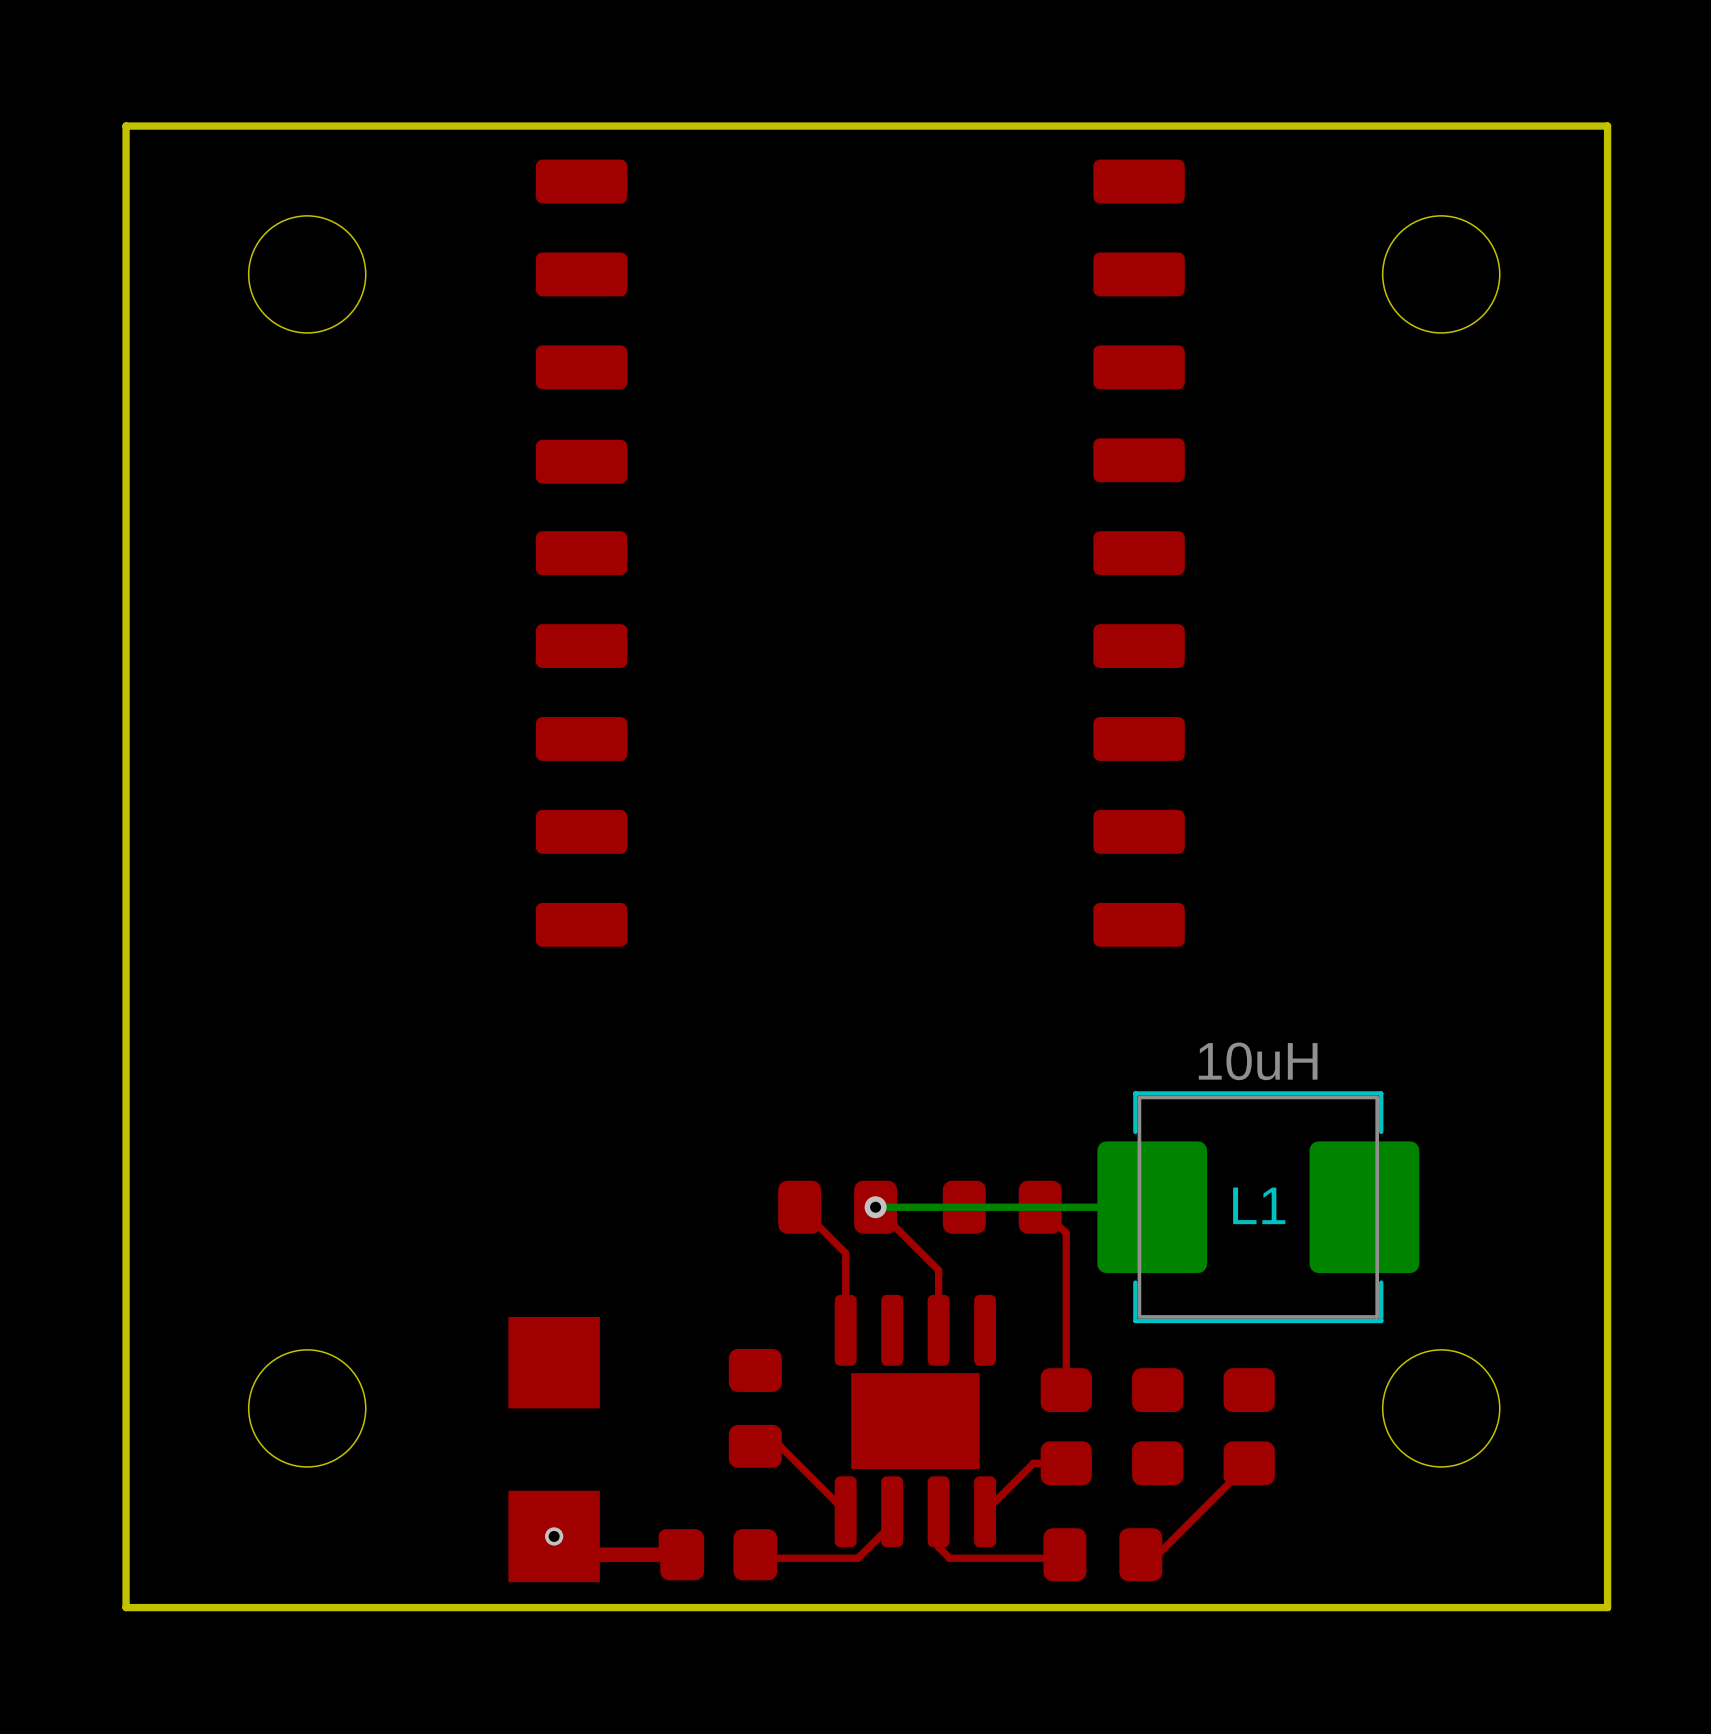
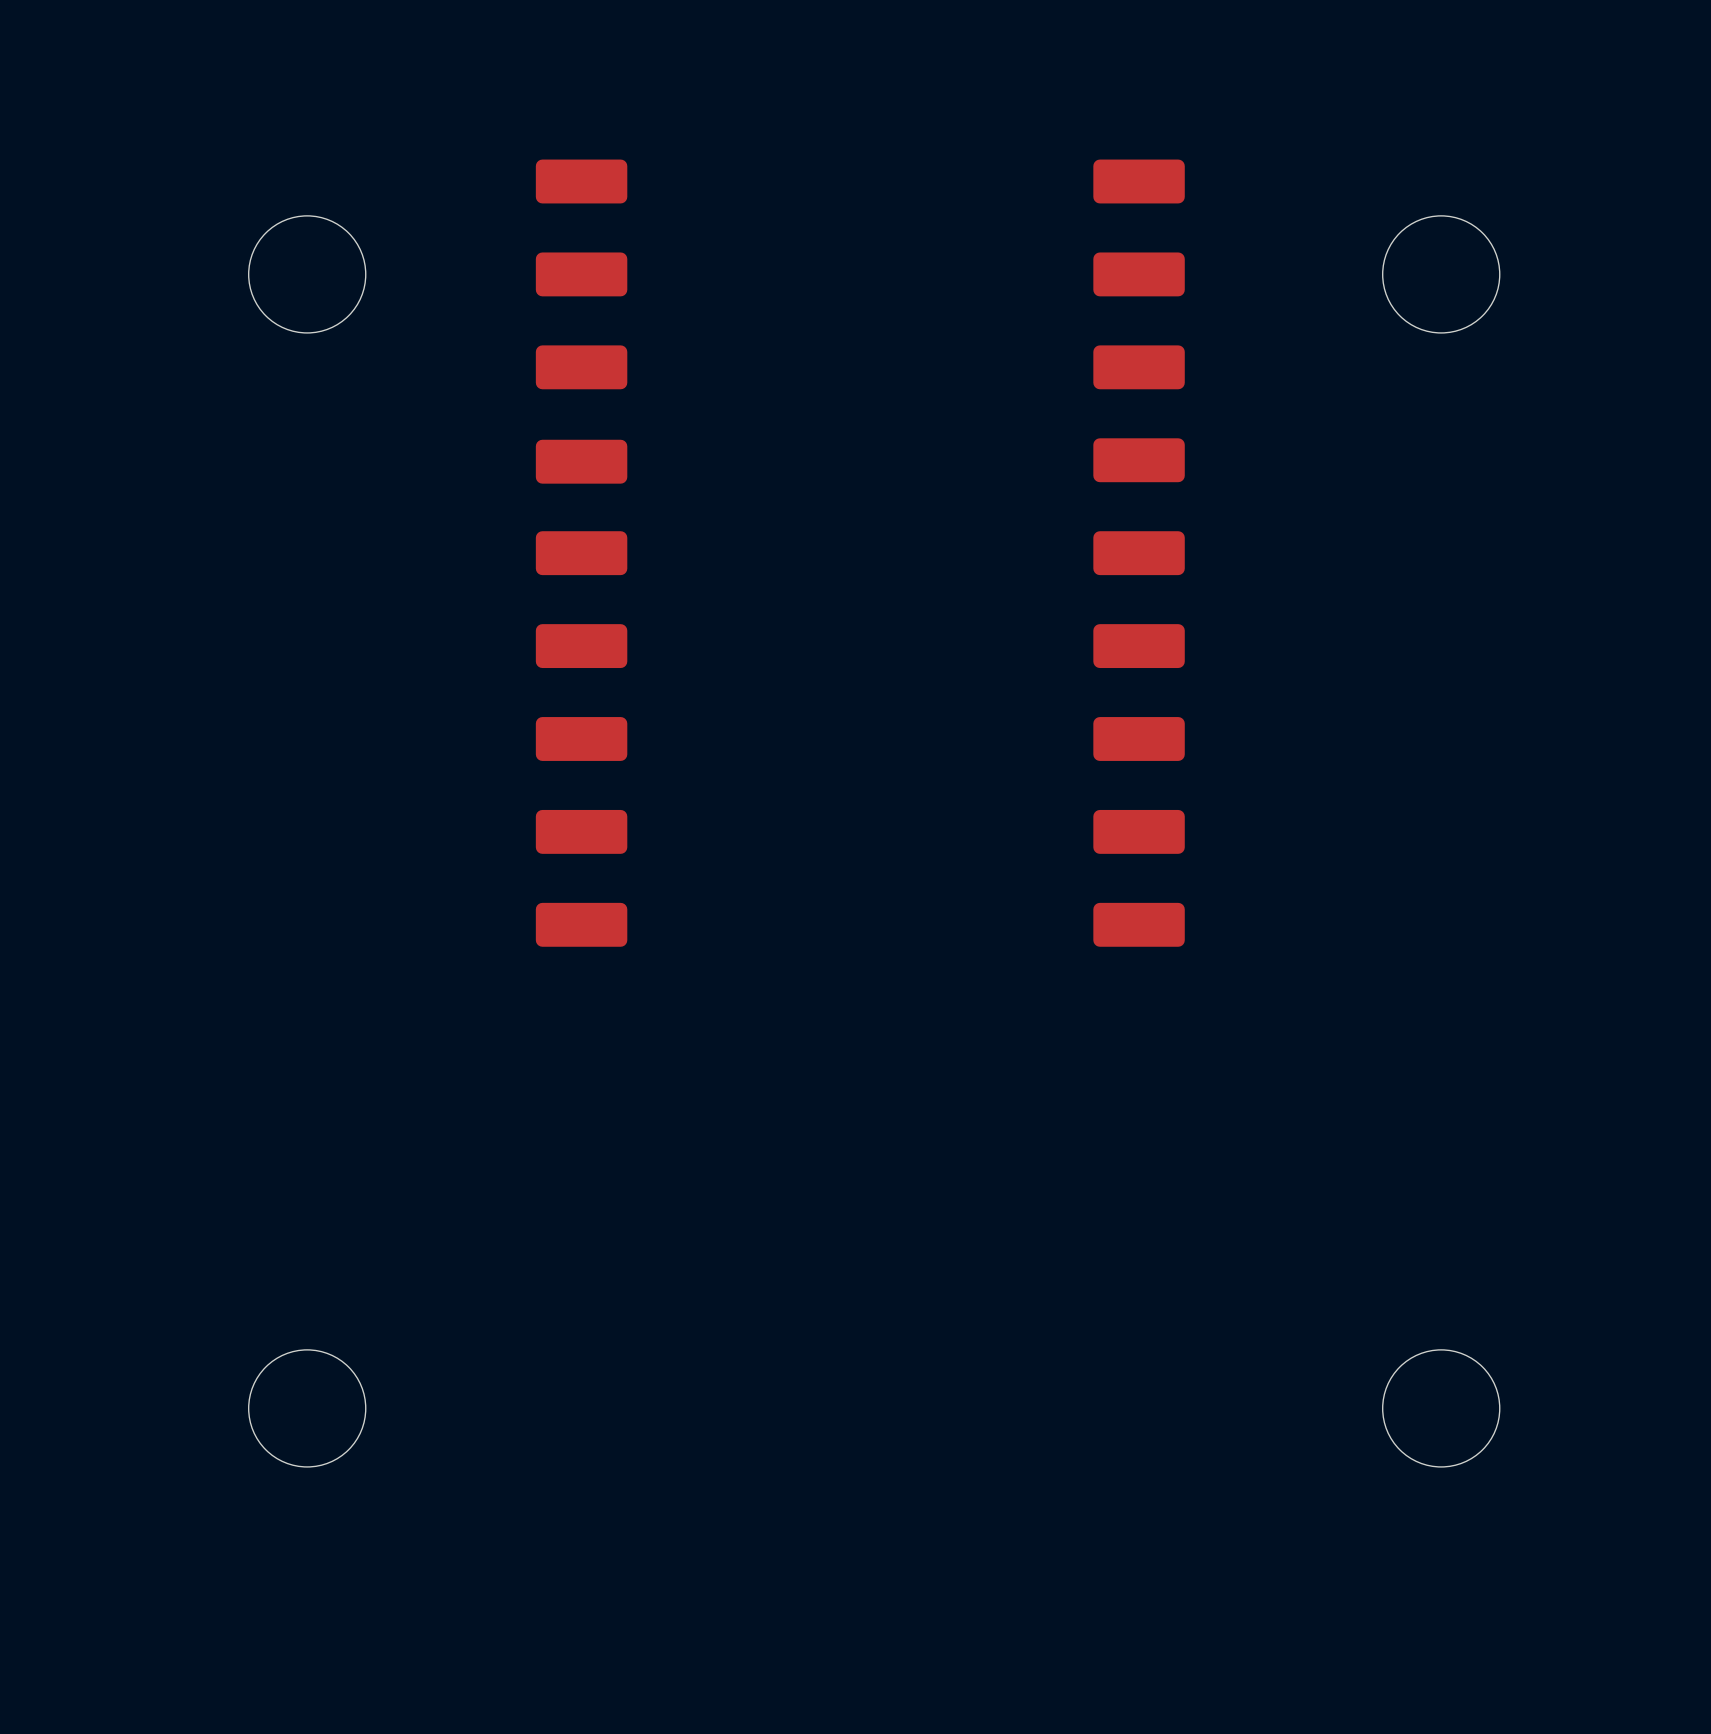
board edge: (1607, 126) (126, 126) (126, 1607) (1607, 1607) (1607, 126) -> none
top track: (799, 1207) (845, 1253) (845, 1330) -> none
part: (837, 1207) -> none
top track: (875, 1207) (938, 1270) (938, 1330) -> none
via: (875, 1207) -> none
part: (1002, 1207) -> none
top track: (1040, 1207) (1066, 1233) (1066, 1390) -> none
bottom track: (1152, 1207) (875, 1207) -> none
L1: 10uH (1258, 1207) -> none
part: (554, 1362) -> none
part: (755, 1408) -> none
part: (915, 1421) -> none
part: (1066, 1426) -> none
part: (1157, 1426) -> none
part: (1249, 1426) -> none
top track: (755, 1446) (780, 1446) (845, 1511) -> none
top track: (1066, 1463) (1033, 1463) (985, 1511) (991, 1518) -> none
top track: (1249, 1463) (1157, 1554) (1140, 1554) -> none
top track: (892, 1511) (892, 1524) (858, 1558) (758, 1558) (755, 1554) -> none
top track: (938, 1511) (938, 1547) (949, 1558) (1061, 1558) (1064, 1554) -> none
part: (554, 1536) -> none
via: (554, 1536) -> none
top track: (665, 1536) (665, 1554) (572, 1554) (554, 1536) -> none
part: (718, 1554) -> none
part: (1102, 1554) -> none

